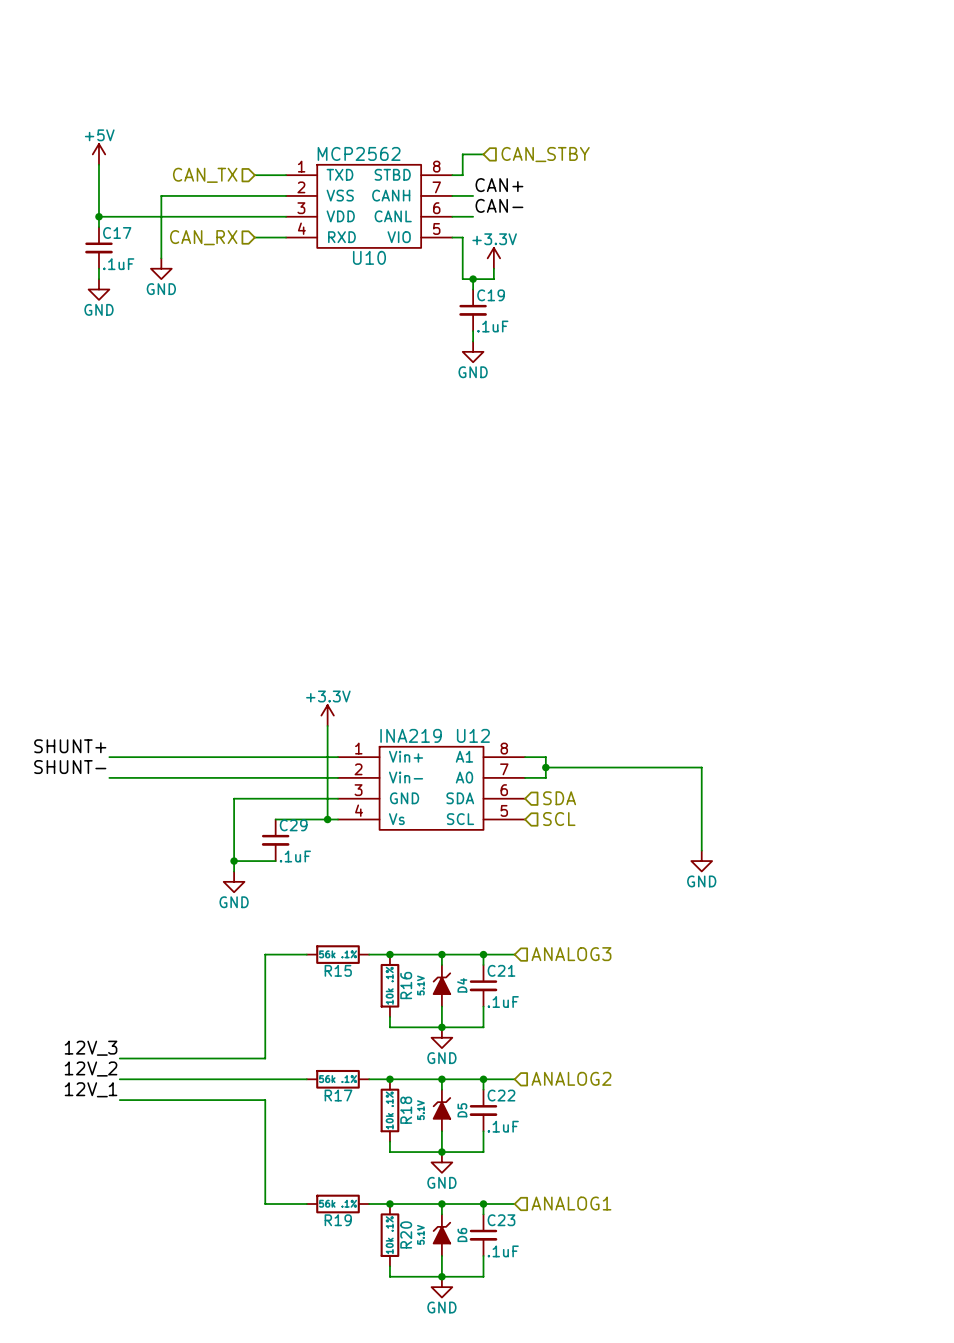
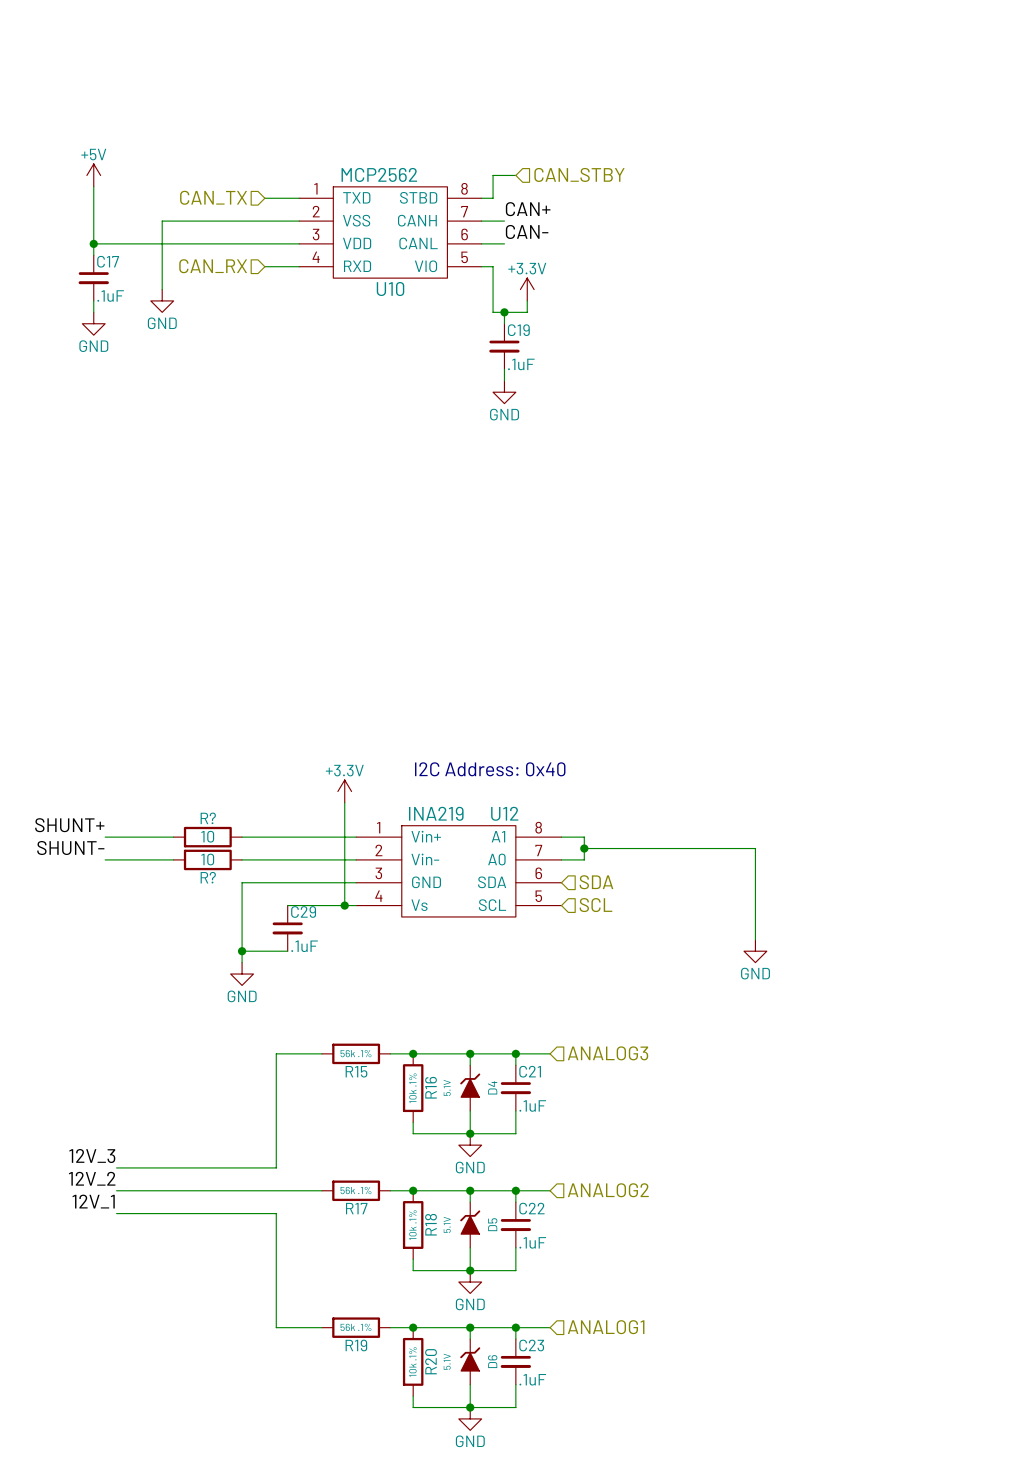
text: none -> I2C Address: 0x40 (490, 769)
wire: (171, 757) (234, 757) -> none
R?: none -> 10 (207, 837)
wire: (171, 777) (234, 777) -> none
R?: none -> 10 (207, 859)

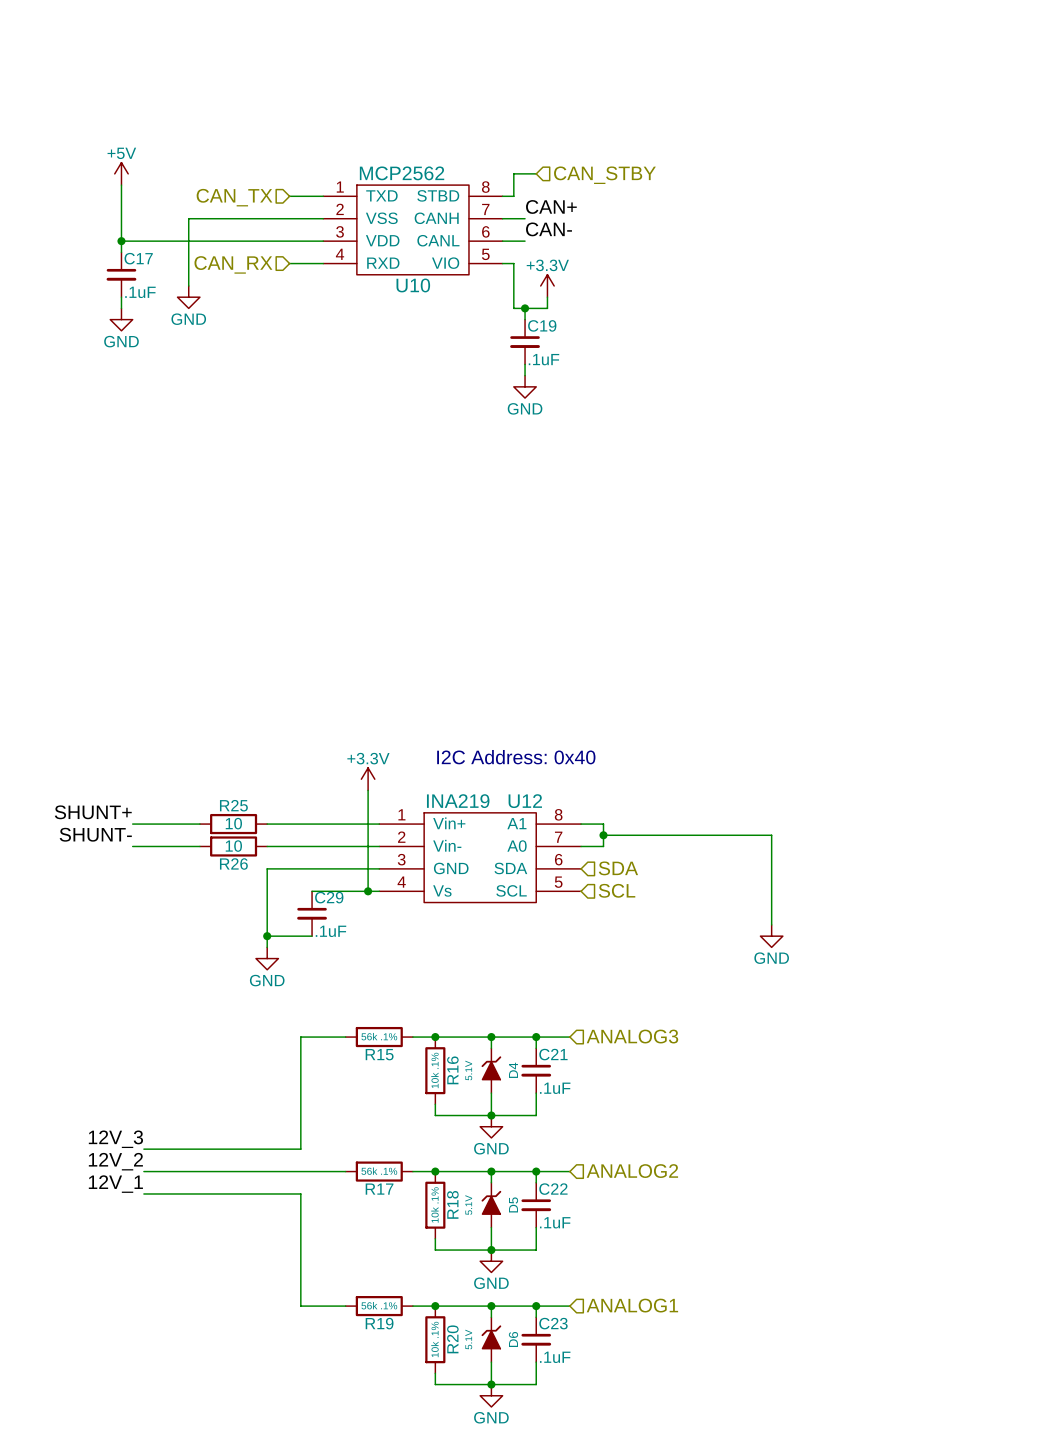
R? name: R? (208, 818) -> R25 (233, 805)
R? name: R? (208, 877) -> R26 (233, 863)

